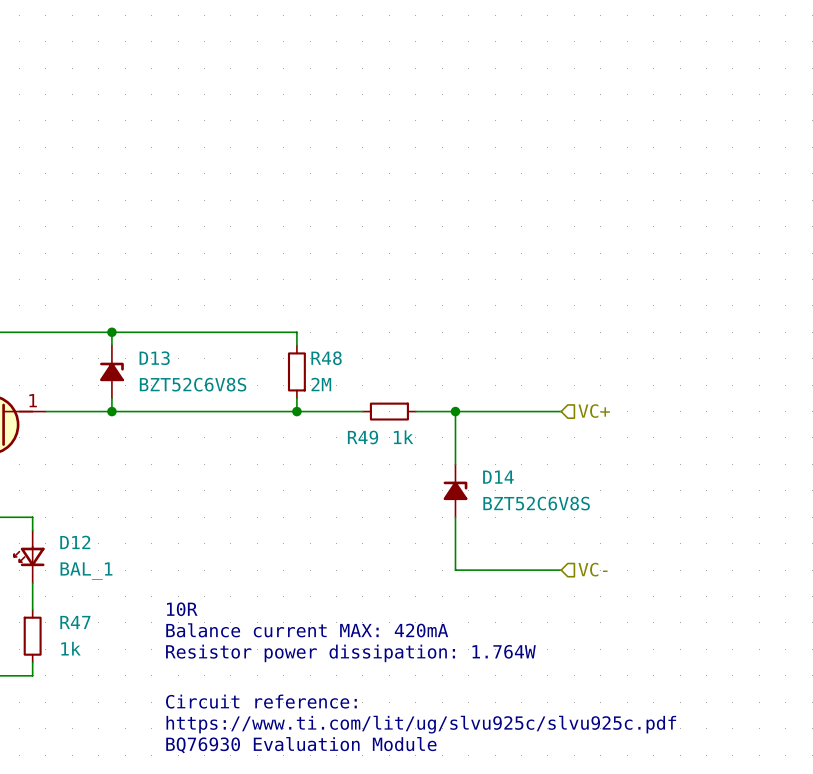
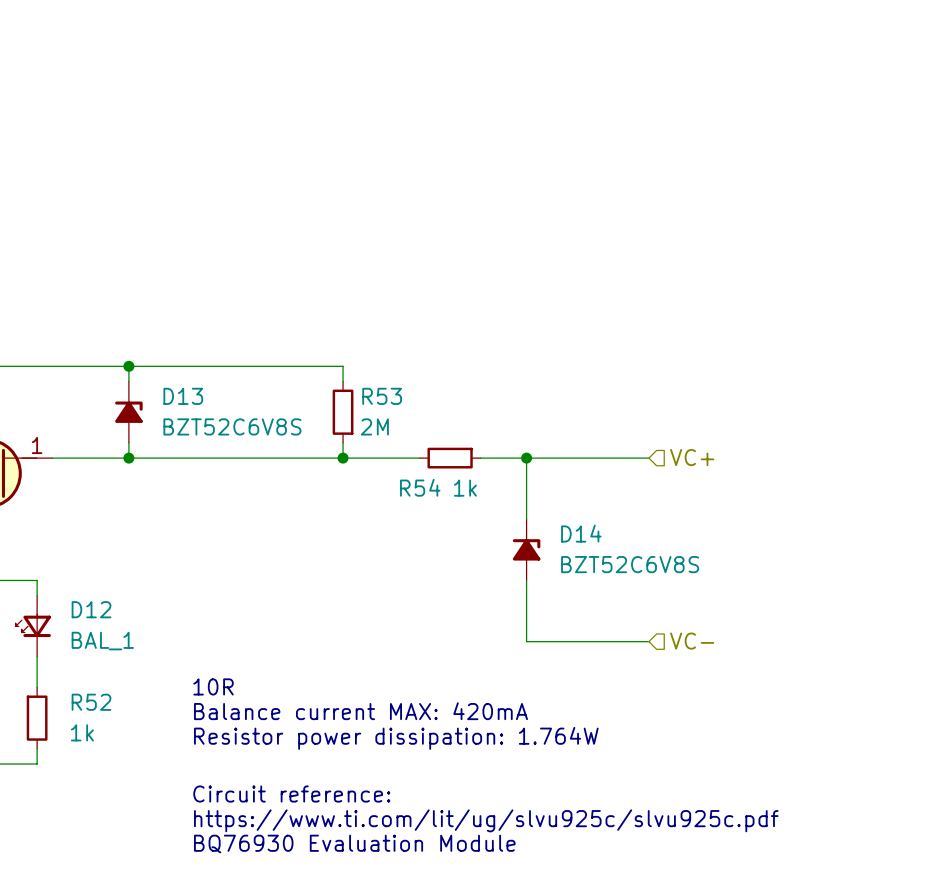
R48 name: R48 (326, 358) -> R53 (382, 396)
R49 name: R49 (363, 437) -> R54 (420, 487)
R47 name: R47 (75, 622) -> R52 (91, 702)

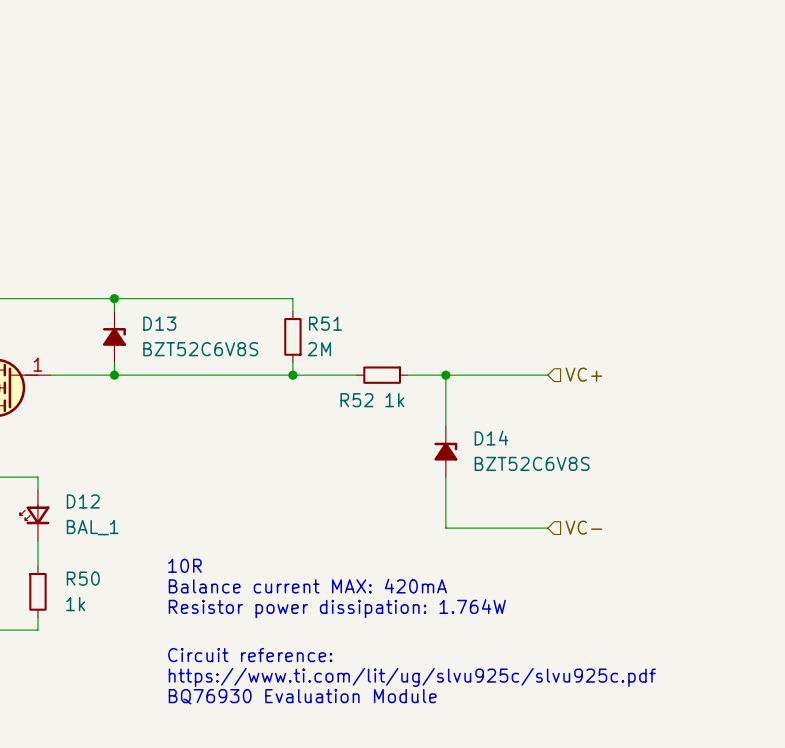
R53 name: R53 (382, 396) -> R51 (325, 323)
R54 name: R54 (420, 487) -> R52 (356, 400)
R52 name: R52 (91, 702) -> R50 (83, 578)

